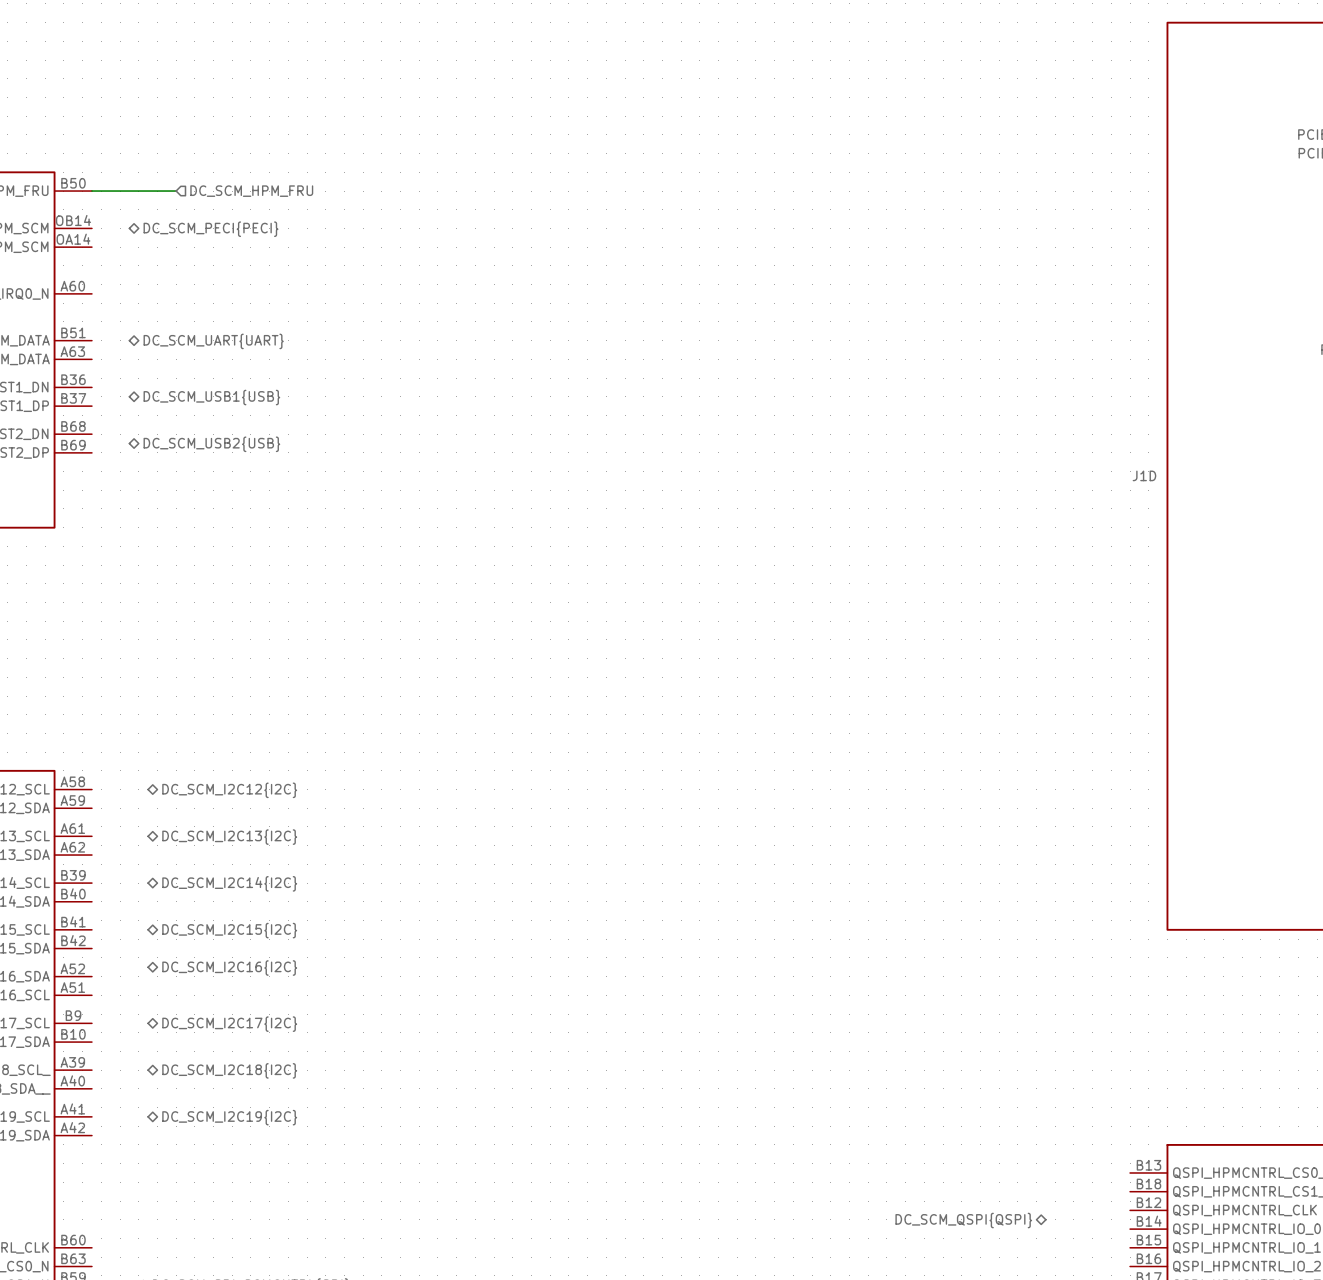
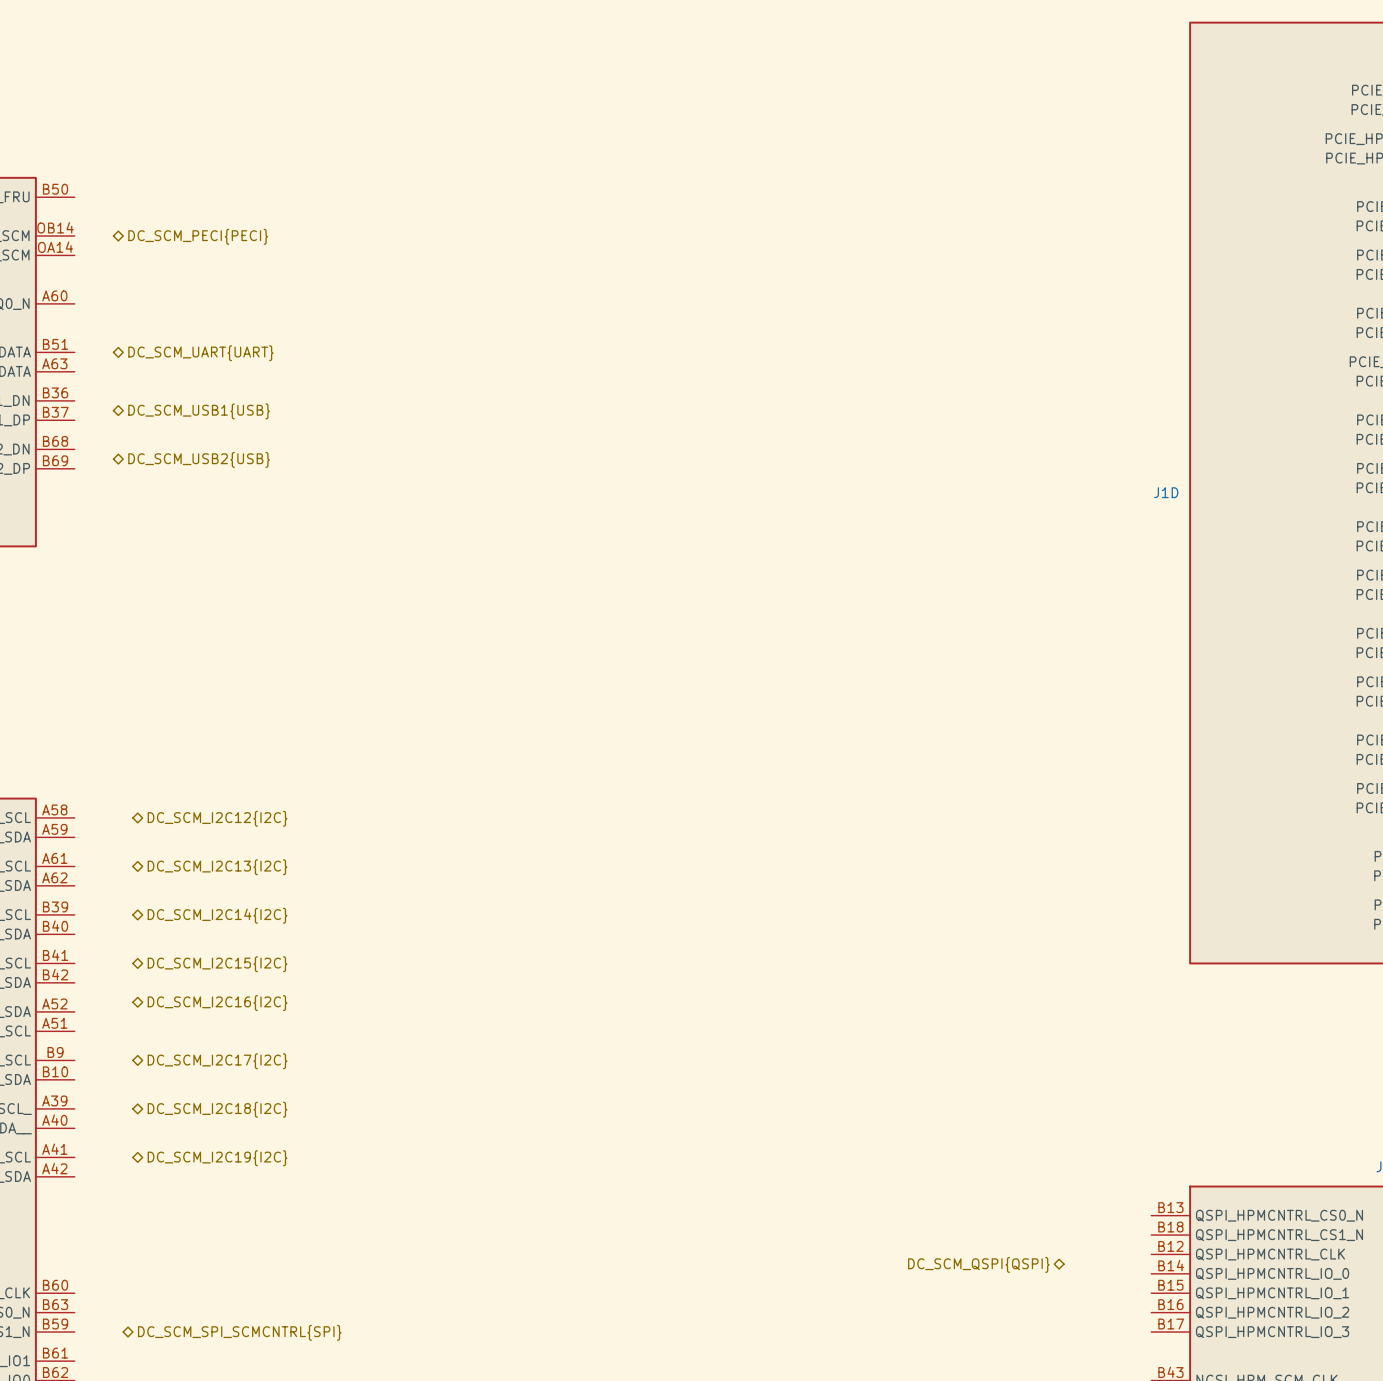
wire: (91, 191) (176, 191) -> none
hierarchical label: DC_SCM_HPM_FRU (251, 191) -> none

